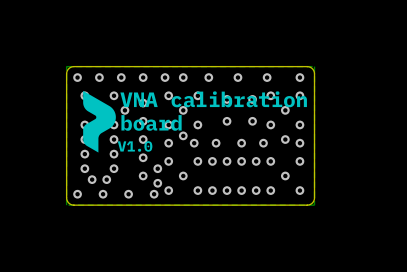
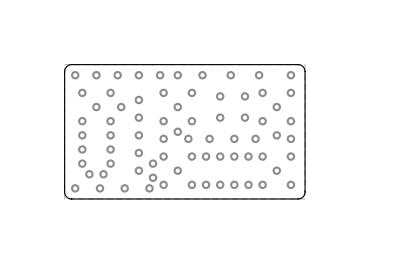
drawing: [83, 90, 116, 153] -> none
text: VNA calibration (213, 99) -> none
text: board (151, 122) -> none
text: V1.0 (135, 146) -> none

